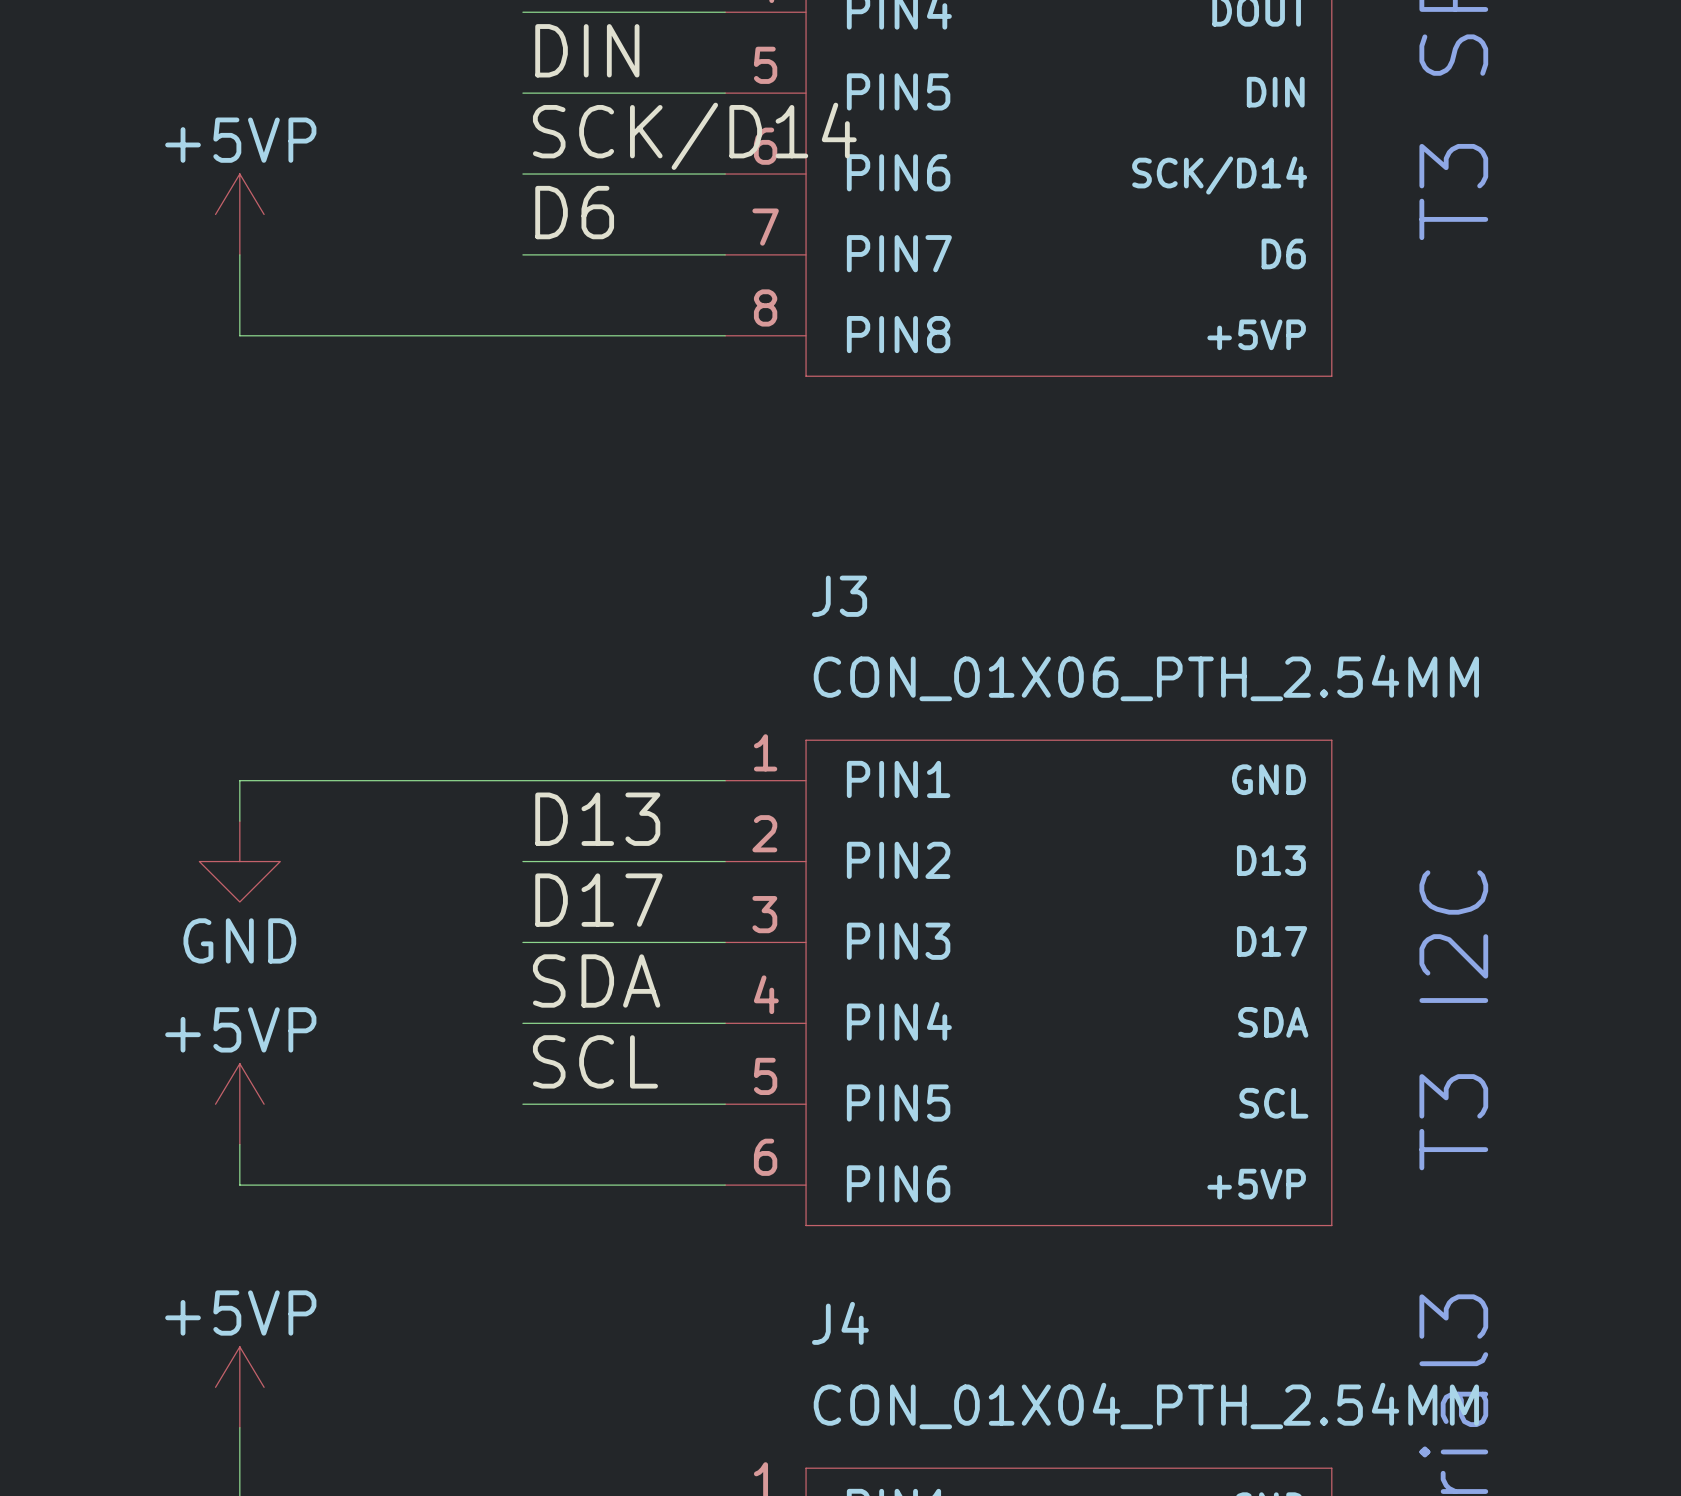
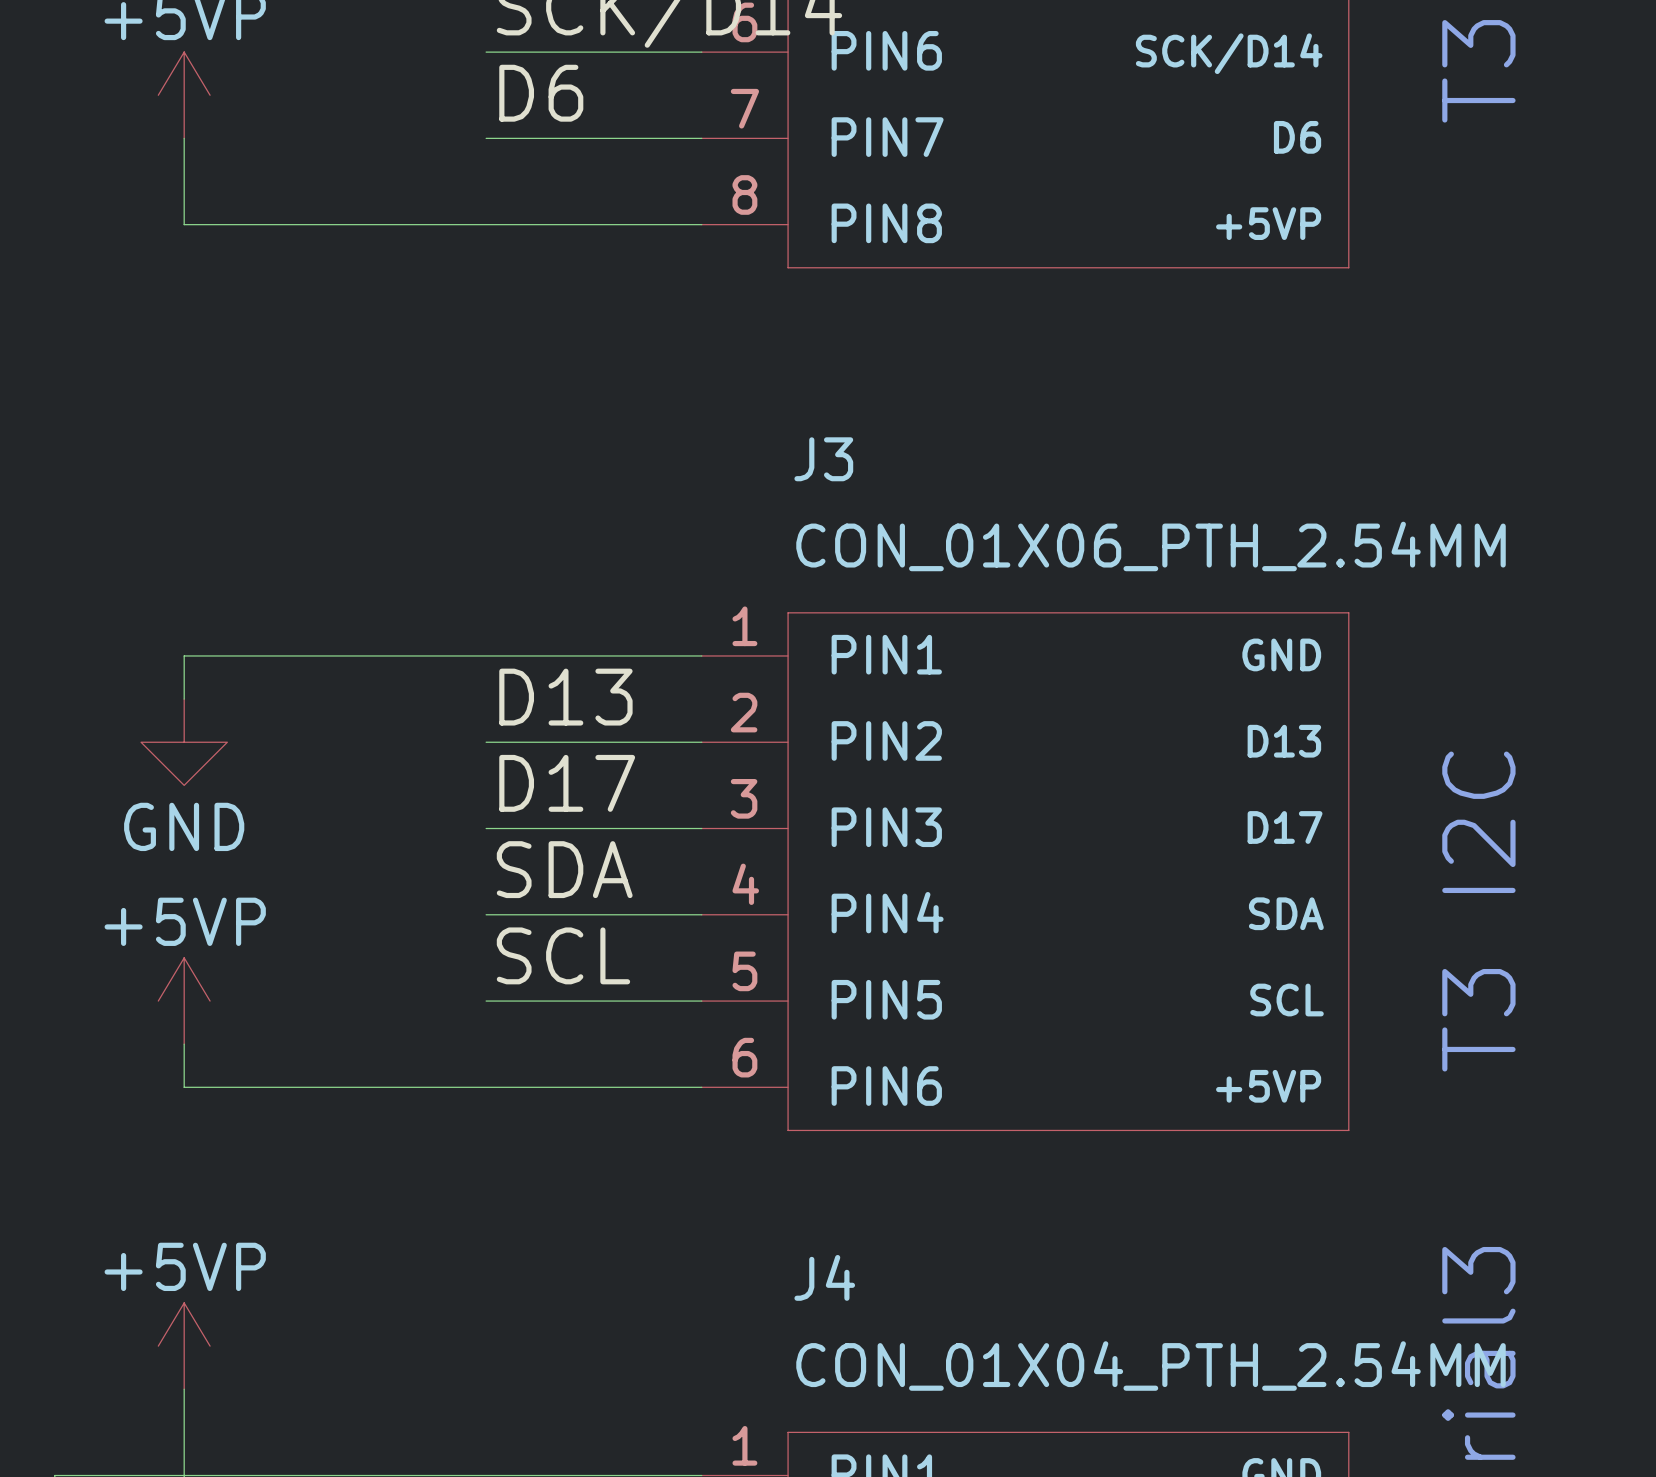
wire: (725, 780) (239, 780) (239, 821) -> (701, 655) (184, 655) (184, 699)
label position: D13 (597, 819) -> D13 (565, 697)
power symbol position: GND (239, 861) -> GND (184, 742)
wire: (522, 861) (725, 861) -> (486, 742) (701, 742)
label position: D17 (598, 900) -> D17 (567, 783)
wire: (522, 942) (725, 942) -> (486, 828) (701, 828)
label position: SDA (596, 980) -> SDA (564, 869)
J3 position: (1028, 982) -> (1025, 871)
text position: T3 I2C (1453, 1020) -> T3 I2C (1478, 911)
wire: (522, 1023) (725, 1023) -> (486, 914) (701, 914)
label position: SCL (595, 1061) -> SCL (563, 955)
power symbol position: +5VP (239, 1104) -> +5VP (184, 1001)
wire: (522, 1104) (725, 1104) -> (486, 1001) (701, 1001)
wire: (239, 1144) (239, 1185) (725, 1185) -> (184, 1044) (184, 1087) (701, 1087)

